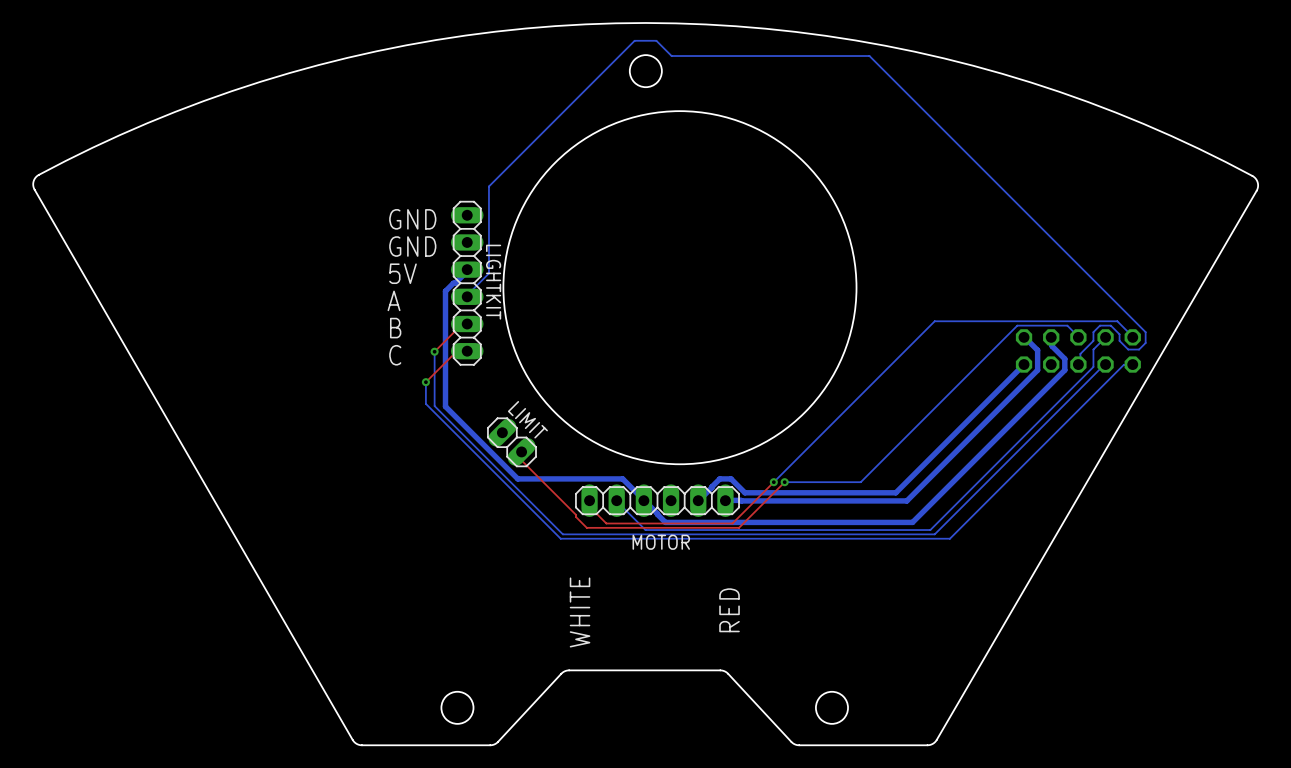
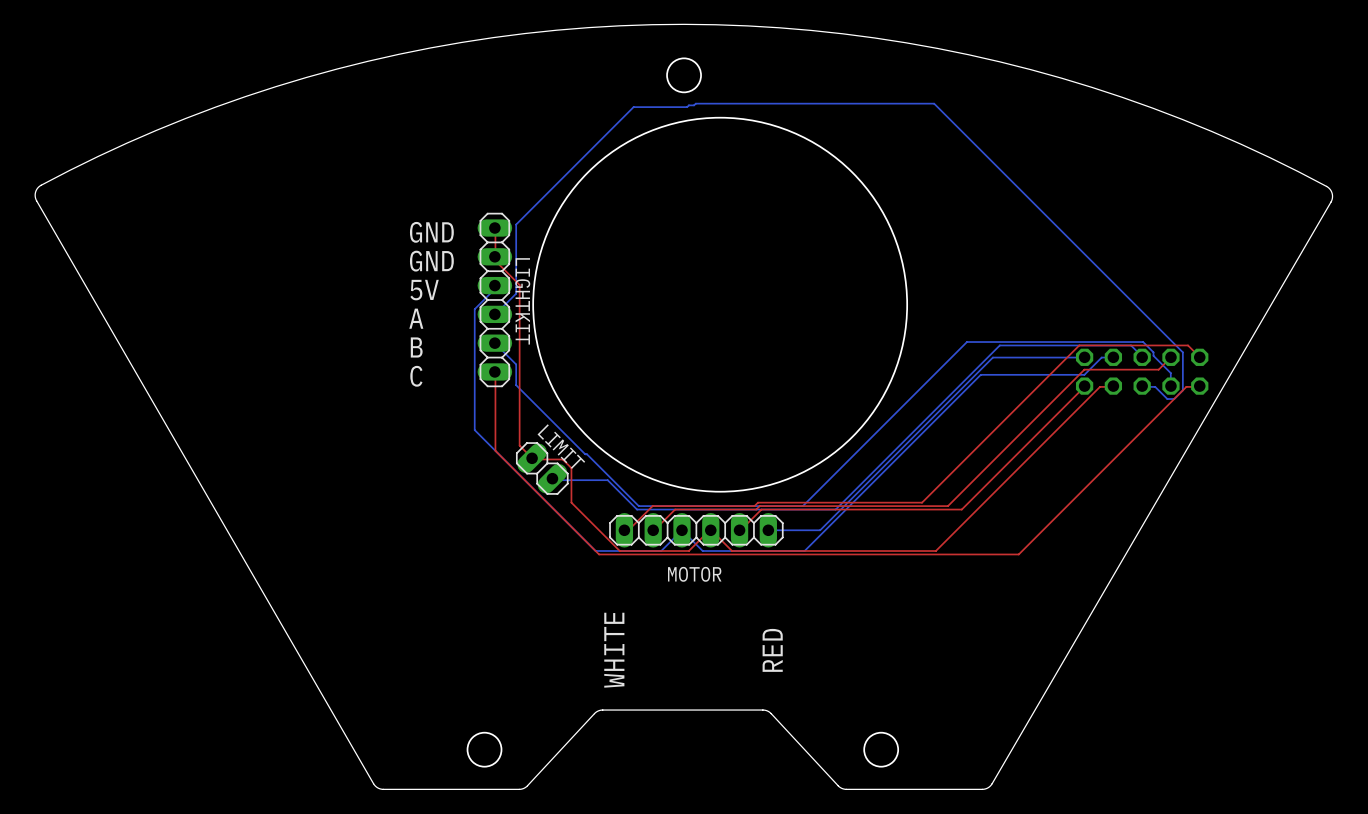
top track: none -> (494, 228) (495, 260) (519, 285) (519, 445) (533, 459) (562, 459) (571, 468) (571, 502) (619, 551) (688, 551) (709, 530) (732, 551) (935, 551) (1099, 386) (1113, 386)
bottom track: (467, 269) (445, 291) (445, 406) (517, 478) (622, 478) (665, 522) (912, 522) (1064, 370) (1064, 358) (1052, 346) (1051, 337) -> (494, 285) (493, 290) (474, 309) (474, 430) (595, 551) (661, 551) (681, 530) (702, 551) (804, 551) (980, 374) (1084, 374) (1101, 357) (1113, 357)
bottom track: (467, 296) (488, 273) (488, 186) (634, 40) (656, 40) (671, 56) (869, 56) (1145, 332) (1145, 343) (1139, 349) (1128, 349) (1119, 340) (1119, 334) (1110, 325) (1099, 325) (1093, 332) (1093, 340) (1080, 353) (1080, 362) (1078, 364) -> (494, 314) (516, 293) (516, 224) (633, 107) (687, 107) (695, 103) (934, 103) (1182, 352) (1182, 390) (1174, 399) (1167, 399) (1155, 386) (1142, 386)
top track: (467, 324) (467, 325) (460, 325) (434, 351) -> none
bottom track: (1067, 326) (1017, 325) (860, 482) (784, 482) -> (1131, 345) (999, 345) (835, 509) (637, 509) (607, 480) (552, 480) (552, 478)
bottom track: (1024, 337) (1037, 350) (1037, 370) (906, 500) (725, 500) -> (1084, 357) (992, 357) (820, 530) (768, 530)
bottom track: (1105, 337) (1093, 349) (1093, 366) (930, 530) (645, 530) (616, 500) -> none
top track: none -> (1170, 357) (1158, 369) (1084, 369) (947, 506) (759, 506) (756, 509) (675, 509) (653, 530)
bottom track: (1132, 337) (1117, 321) (934, 321) (773, 482) -> none
top track: none -> (1199, 357) (1188, 345) (1079, 345) (922, 502) (757, 502) (754, 506) (652, 506) (628, 530) (624, 530)
bottom track: (434, 351) (434, 406) (562, 534) (934, 534) (1105, 364) -> (494, 343) (516, 364) (516, 385) (638, 506) (802, 506) (966, 342) (1143, 342) (1170, 373) (1170, 386)
via: (434, 351) -> none
top track: (467, 351) (456, 351) (425, 382) -> none
bottom track: (1024, 364) (895, 492) (744, 492) (731, 478) (719, 478) (698, 500) -> none
top track: none -> (1084, 386) (961, 509) (761, 509) (739, 530)
bottom track: (1132, 364) (1123, 364) (949, 538) (560, 538) (425, 403) (425, 382) -> none
via: (425, 382) -> none
top track: (521, 451) (521, 460) (586, 527) (739, 527) (784, 482) -> none
top track: (773, 482) (732, 523) -> (1199, 386) (1186, 386) (1018, 554) (775, 554)
via: (773, 482) -> none
via: (784, 482) -> none
top track: (589, 500) (591, 508) (606, 523) -> (494, 371) (495, 450) (599, 554) (642, 554)

